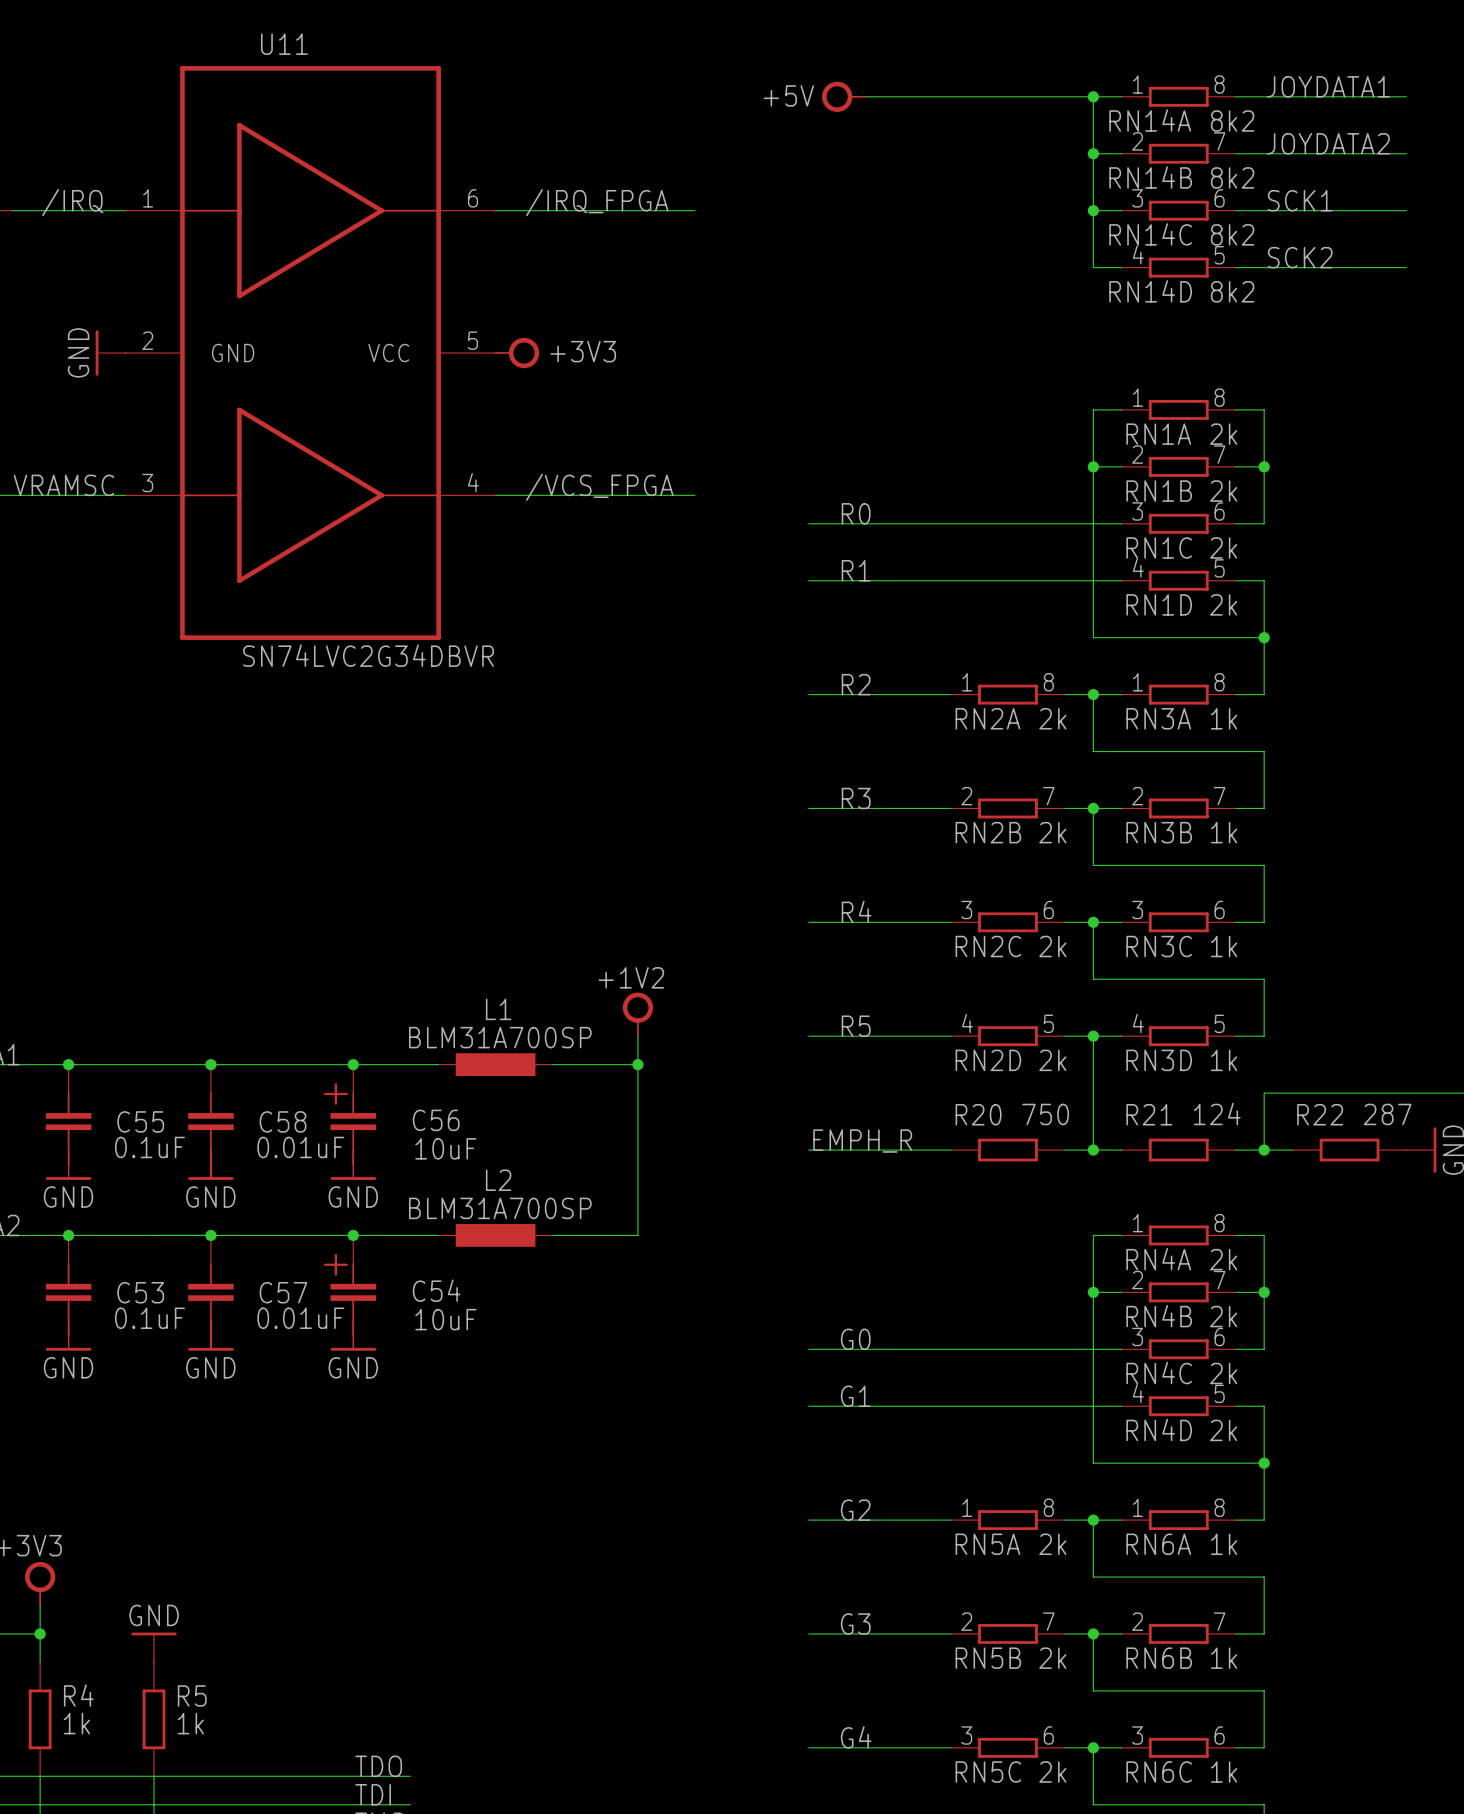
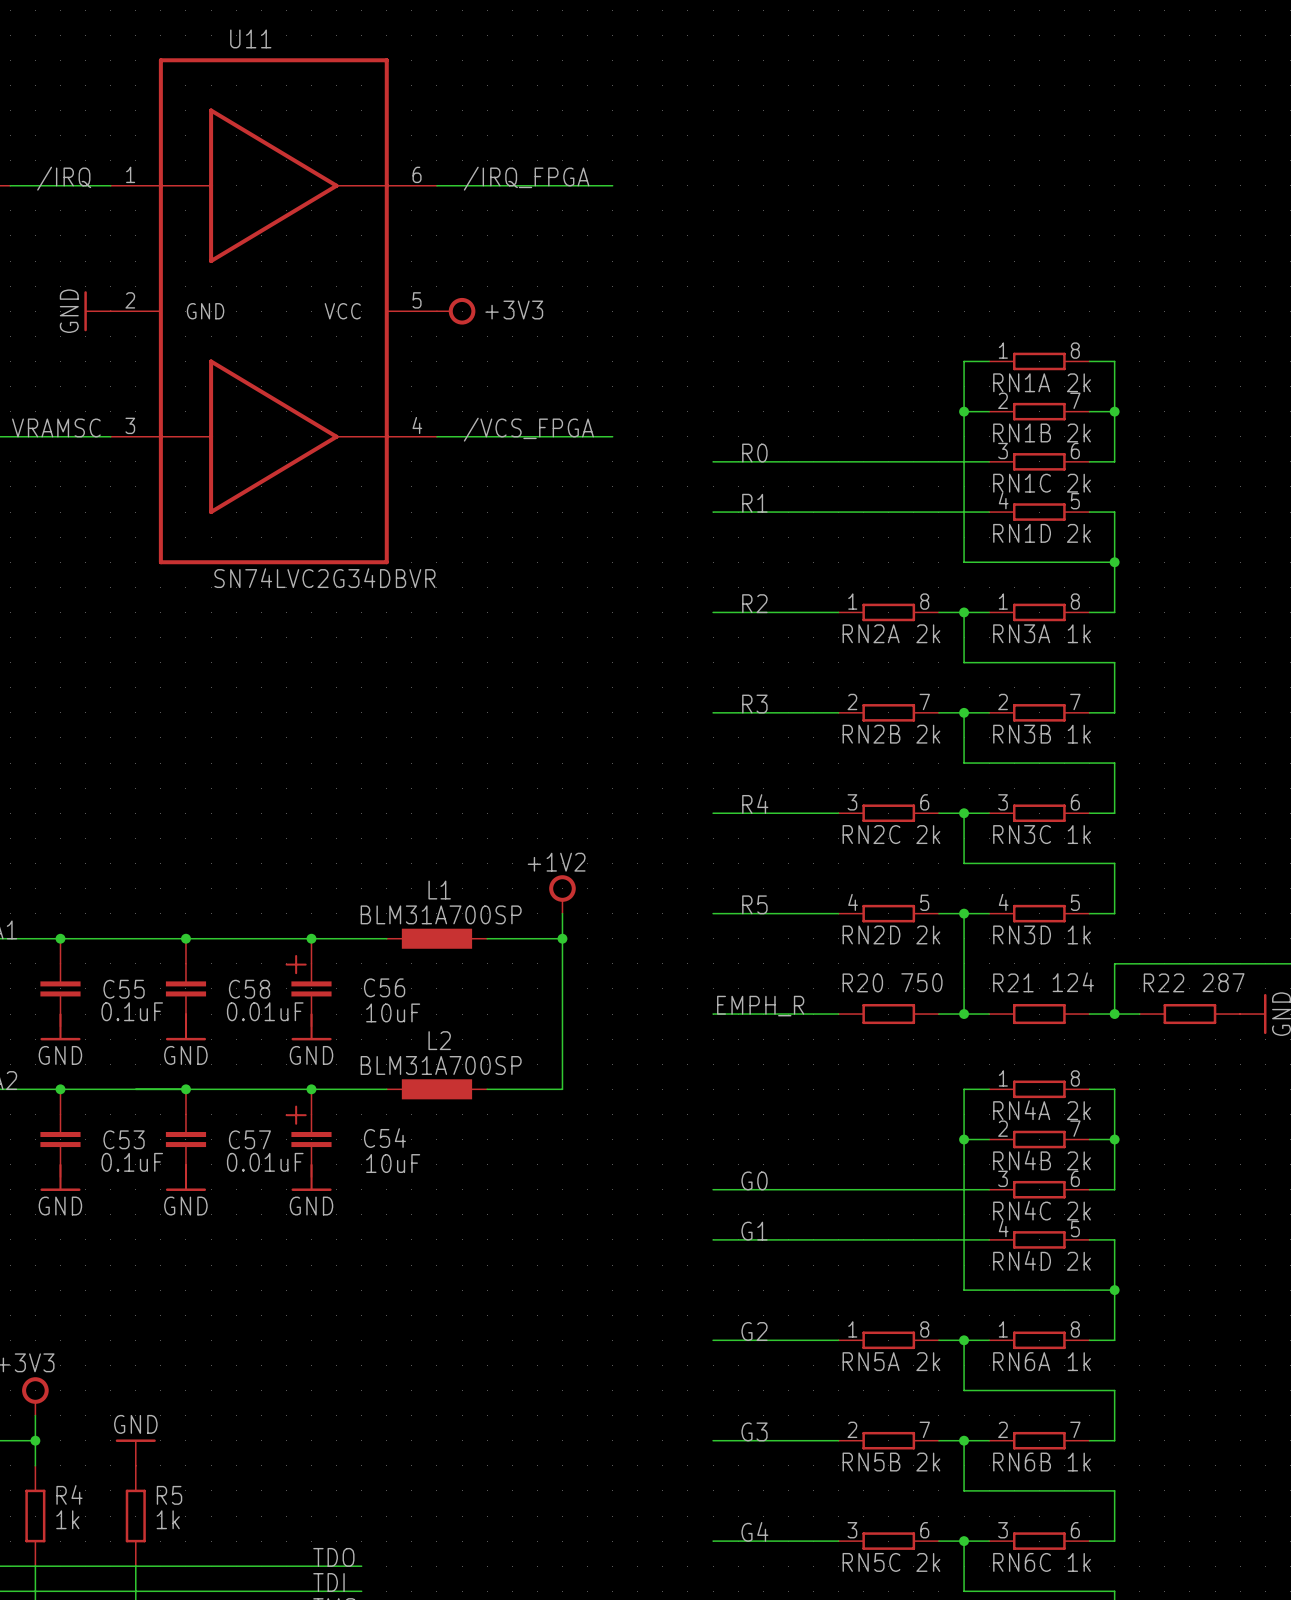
label: JOYDATA1 (1328, 86) -> none
power symbol: +5V (844, 96) -> none
wire: (865, 96) (1121, 96) -> none
wire: (1093, 96) (1093, 267) (1121, 267) -> none
junction: (1093, 96) -> none
RN14A: 8k2 (1178, 96) -> none
wire: (1235, 96) (1406, 96) -> none
label: JOYDATA2 (1328, 143) -> none
wire: (1093, 153) (1121, 153) -> none
junction: (1093, 153) -> none
RN14B: 8k2 (1178, 153) -> none
wire: (1235, 153) (1406, 153) -> none
label: SCK1 (1300, 200) -> none
wire: (1093, 210) (1121, 210) -> none
junction: (1093, 210) -> none
RN14C: 8k2 (1178, 210) -> none
wire: (1235, 210) (1406, 210) -> none
label: SCK2 (1300, 257) -> none
RN14D: 8k2 (1178, 267) -> none
wire: (1235, 267) (1406, 267) -> none

